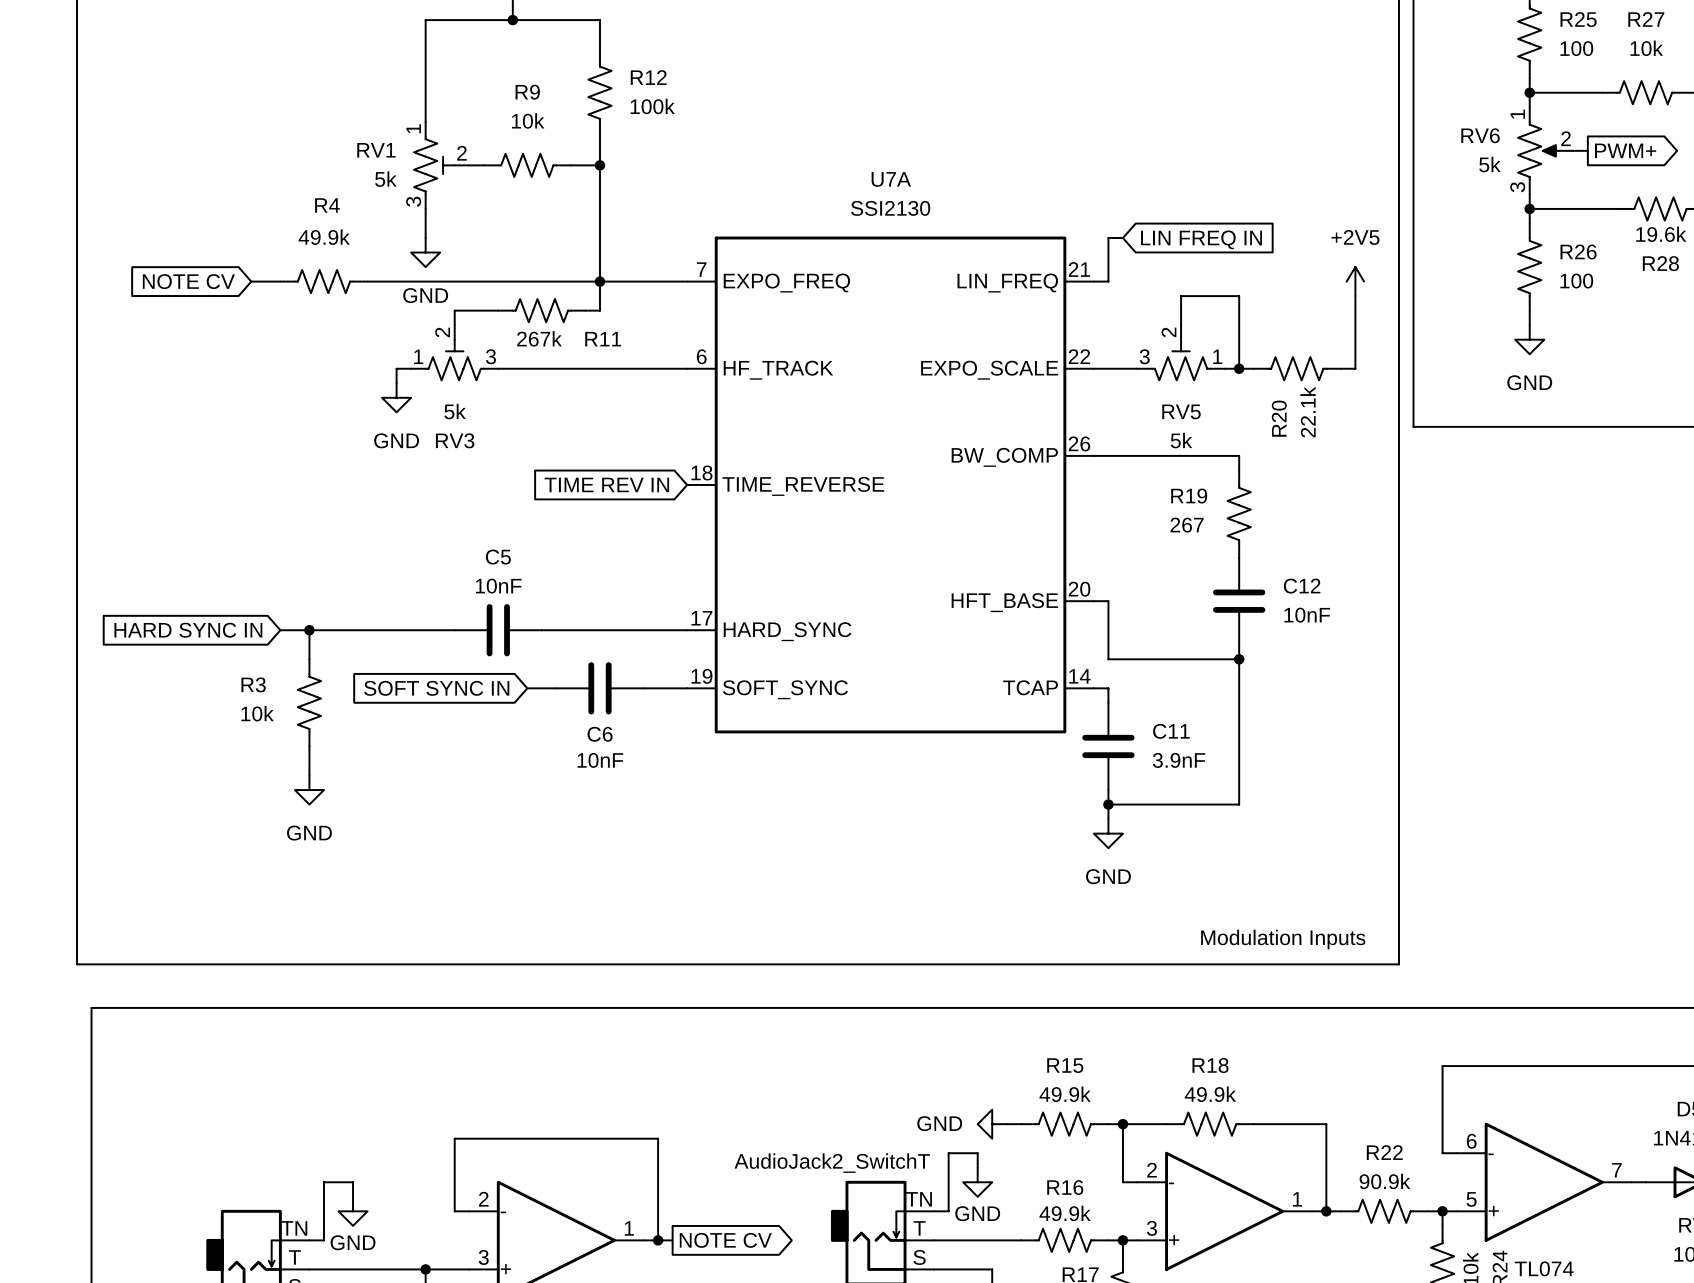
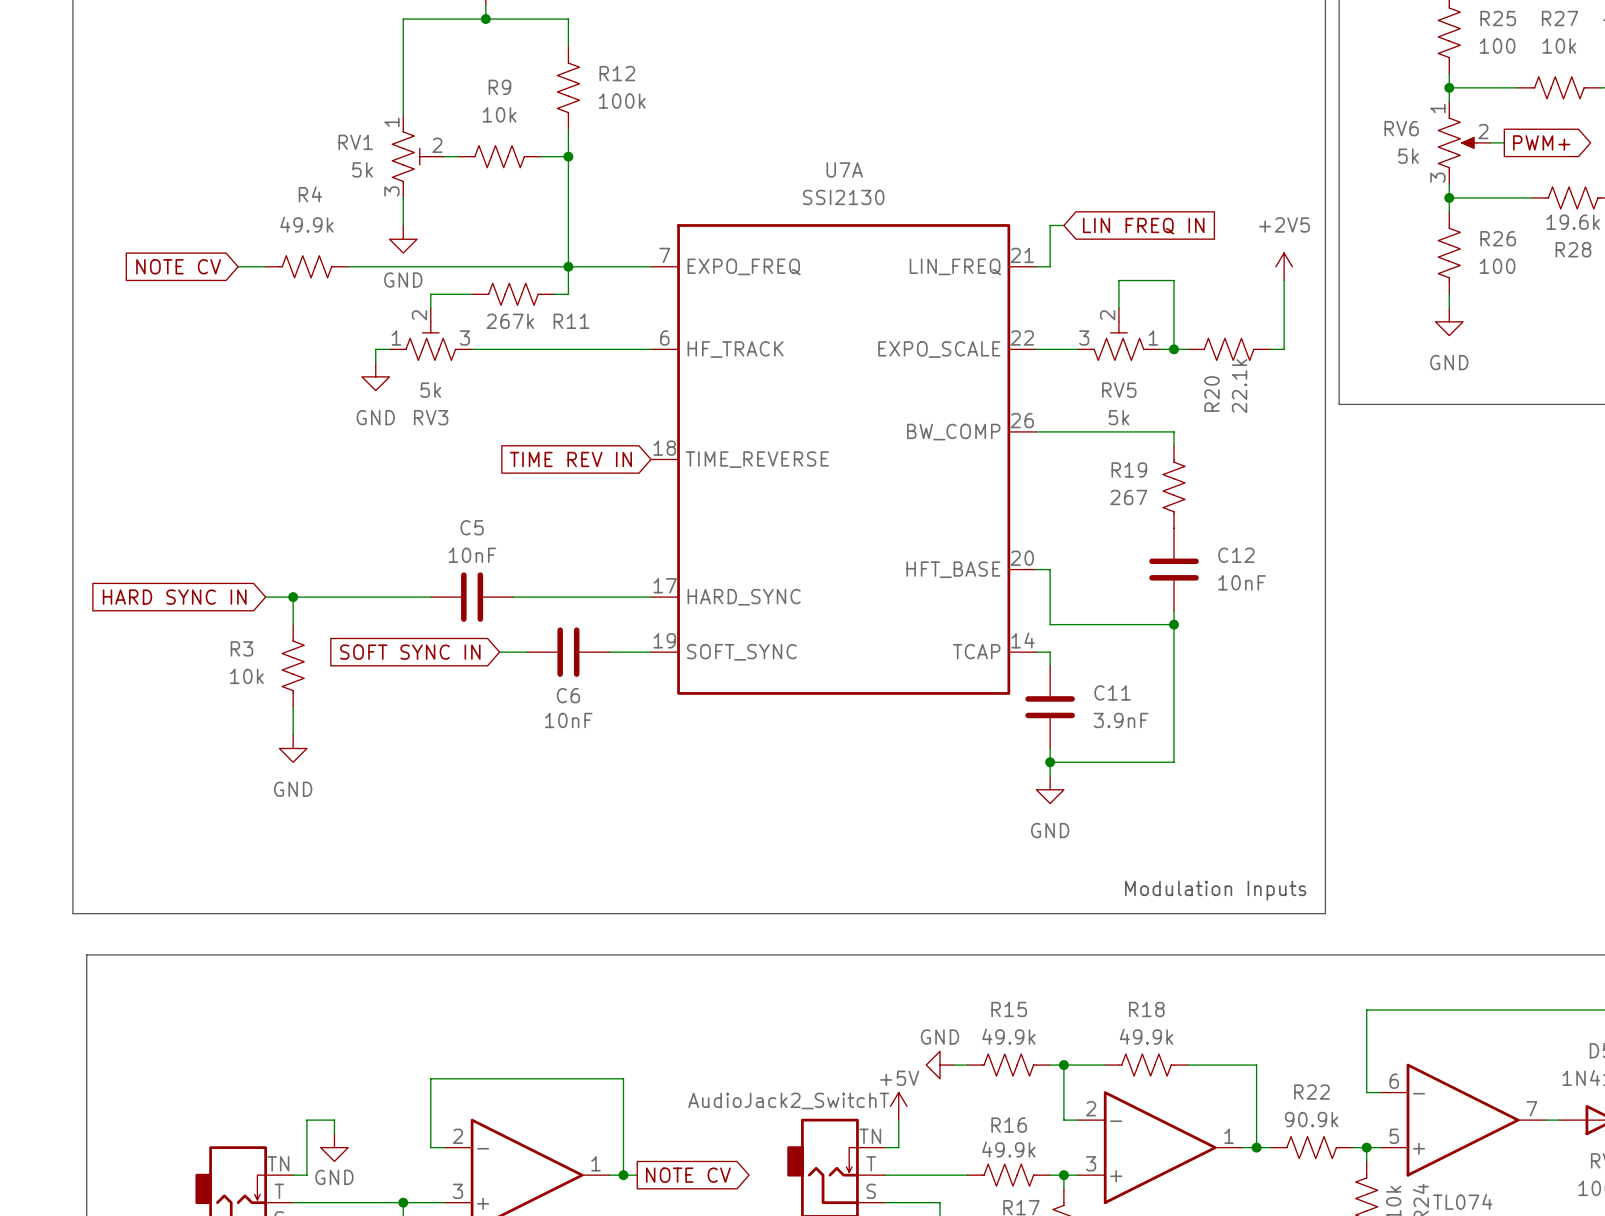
power symbol text position: GND (939, 1123) -> GND (940, 1037)
power symbol: none -> +5V (898, 1106)
wire: (977, 1167) (977, 1153) (948, 1153) (948, 1182) -> none
power symbol: GND (977, 1182) -> none

